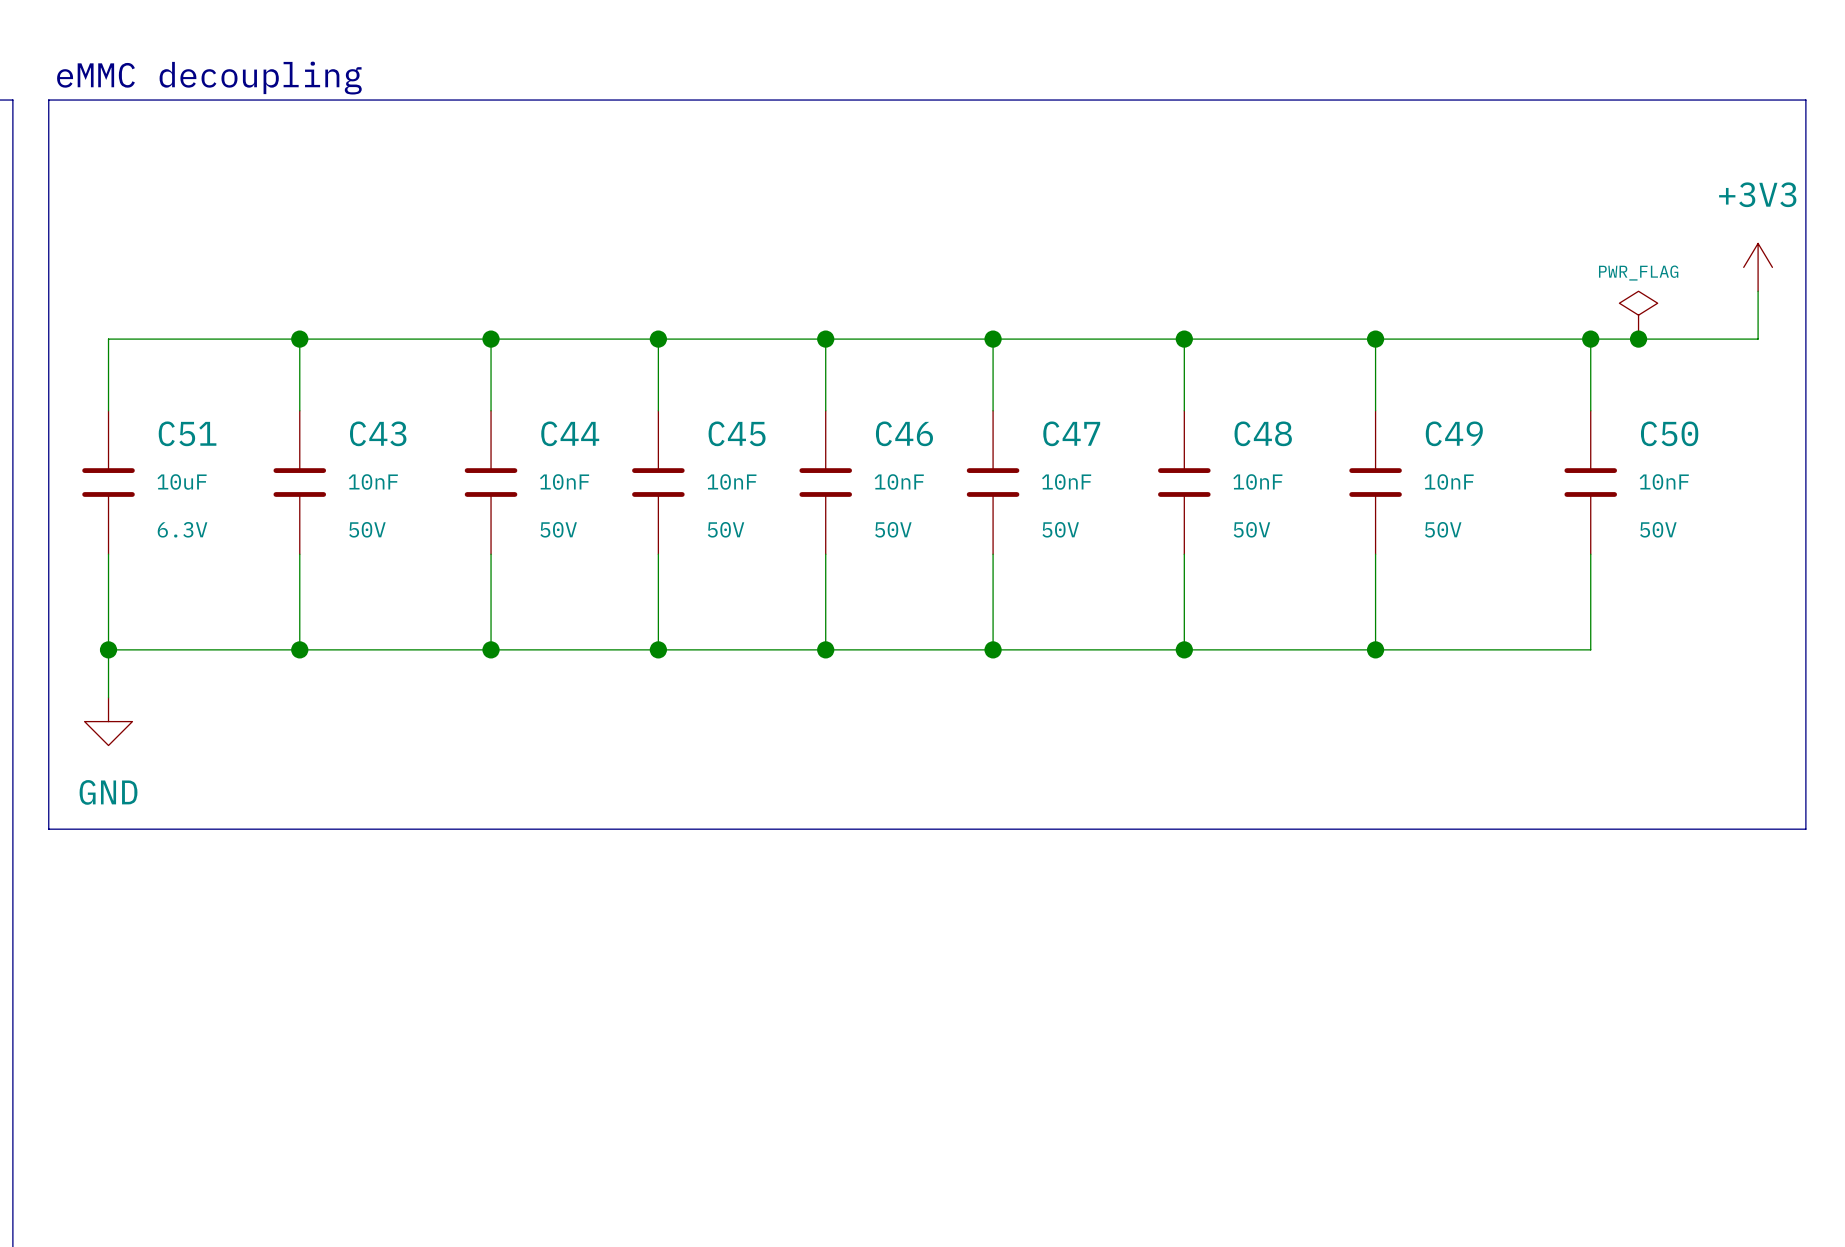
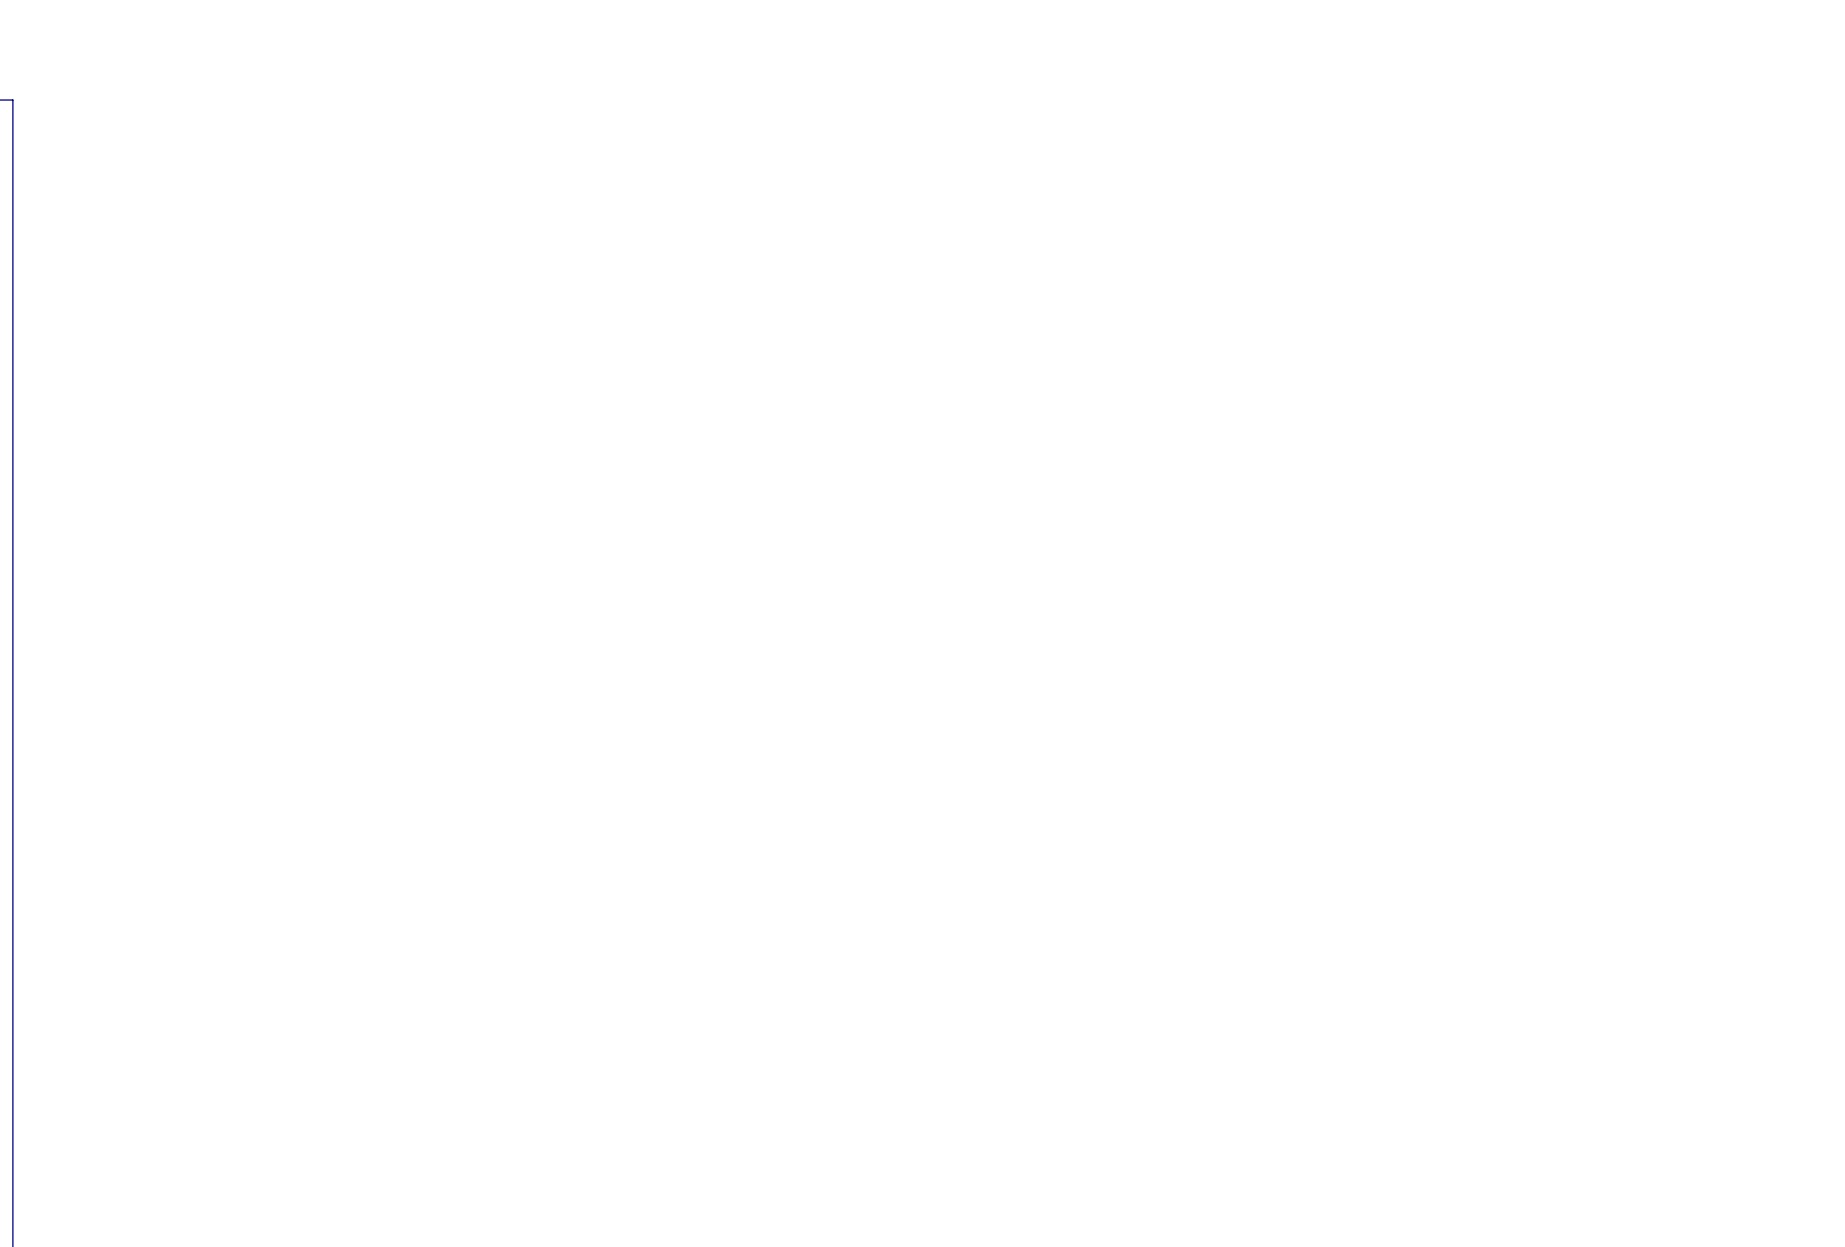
text: eMMC decoupling (209, 78) -> none
line: (48, 100) (1805, 100) (1805, 829) (48, 829) (48, 100) -> none
power symbol: +3V3 (1758, 267) -> none
wire: (1758, 291) (1758, 339) (108, 339) (108, 410) -> none
power symbol: PWR_FLAG (1638, 315) -> none
wire: (299, 339) (299, 410) -> none
junction: (299, 339) -> none
wire: (491, 339) (491, 410) -> none
junction: (491, 339) -> none
wire: (658, 339) (658, 410) -> none
junction: (658, 339) -> none
wire: (825, 339) (825, 410) -> none
junction: (825, 339) -> none
wire: (993, 339) (993, 410) -> none
junction: (993, 339) -> none
wire: (1184, 339) (1184, 410) -> none
junction: (1184, 339) -> none
wire: (1375, 339) (1375, 410) -> none
junction: (1375, 339) -> none
wire: (1590, 339) (1590, 410) -> none
junction: (1590, 339) -> none
junction: (1638, 339) -> none
C51: 10uF (108, 482) -> none
C43: 10nF (299, 482) -> none
C44: 10nF (491, 482) -> none
C45: 10nF (658, 482) -> none
C46: 10nF (825, 482) -> none
C47: 10nF (993, 482) -> none
C48: 10nF (1184, 482) -> none
C49: 10nF (1375, 482) -> none
C50: 10nF (1590, 482) -> none
wire: (108, 554) (108, 697) -> none
wire: (299, 554) (299, 649) -> none
wire: (491, 554) (491, 649) -> none
wire: (658, 554) (658, 649) -> none
wire: (825, 554) (825, 649) -> none
wire: (993, 554) (993, 649) -> none
wire: (1184, 554) (1184, 649) -> none
wire: (1375, 554) (1375, 649) -> none
wire: (1590, 554) (1590, 649) (108, 649) -> none
junction: (108, 649) -> none
junction: (299, 649) -> none
junction: (491, 649) -> none
junction: (658, 649) -> none
junction: (825, 649) -> none
junction: (993, 649) -> none
junction: (1184, 649) -> none
junction: (1375, 649) -> none
power symbol: GND (108, 721) -> none

